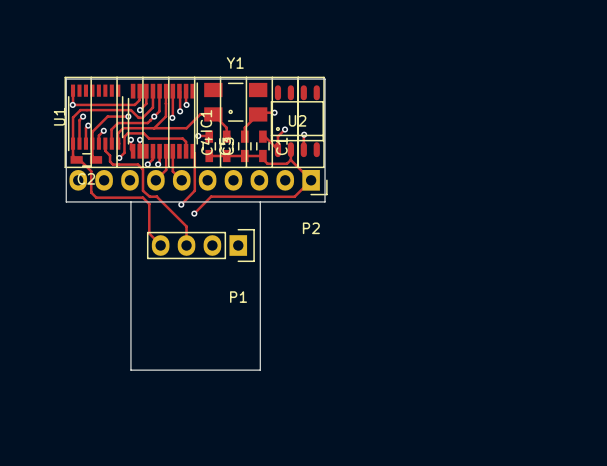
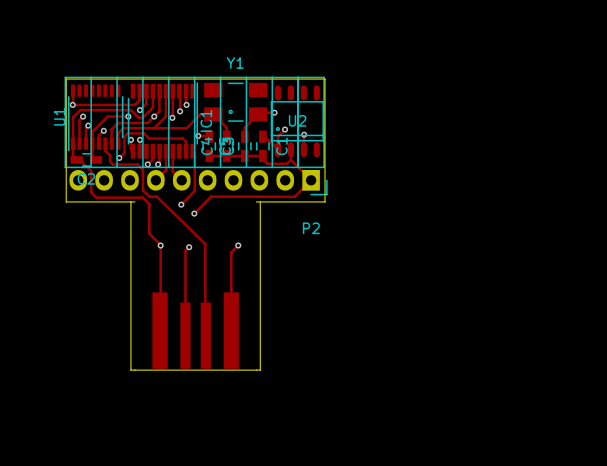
track: (156, 196) (186, 226) (186, 245) -> (156, 196) (205, 244) (205, 335)
board edge: (134, 201) (256, 201) -> none
track: none -> (160, 245) (160, 330)
via: none -> (160, 245)
P1: (200, 245) -> none
track: none -> (238, 245) (231, 252) (231, 330)
via: none -> (238, 245)
track: none -> (189, 247) (185, 250) (186, 334)
via: none -> (189, 247)
part: none -> (195, 330)

